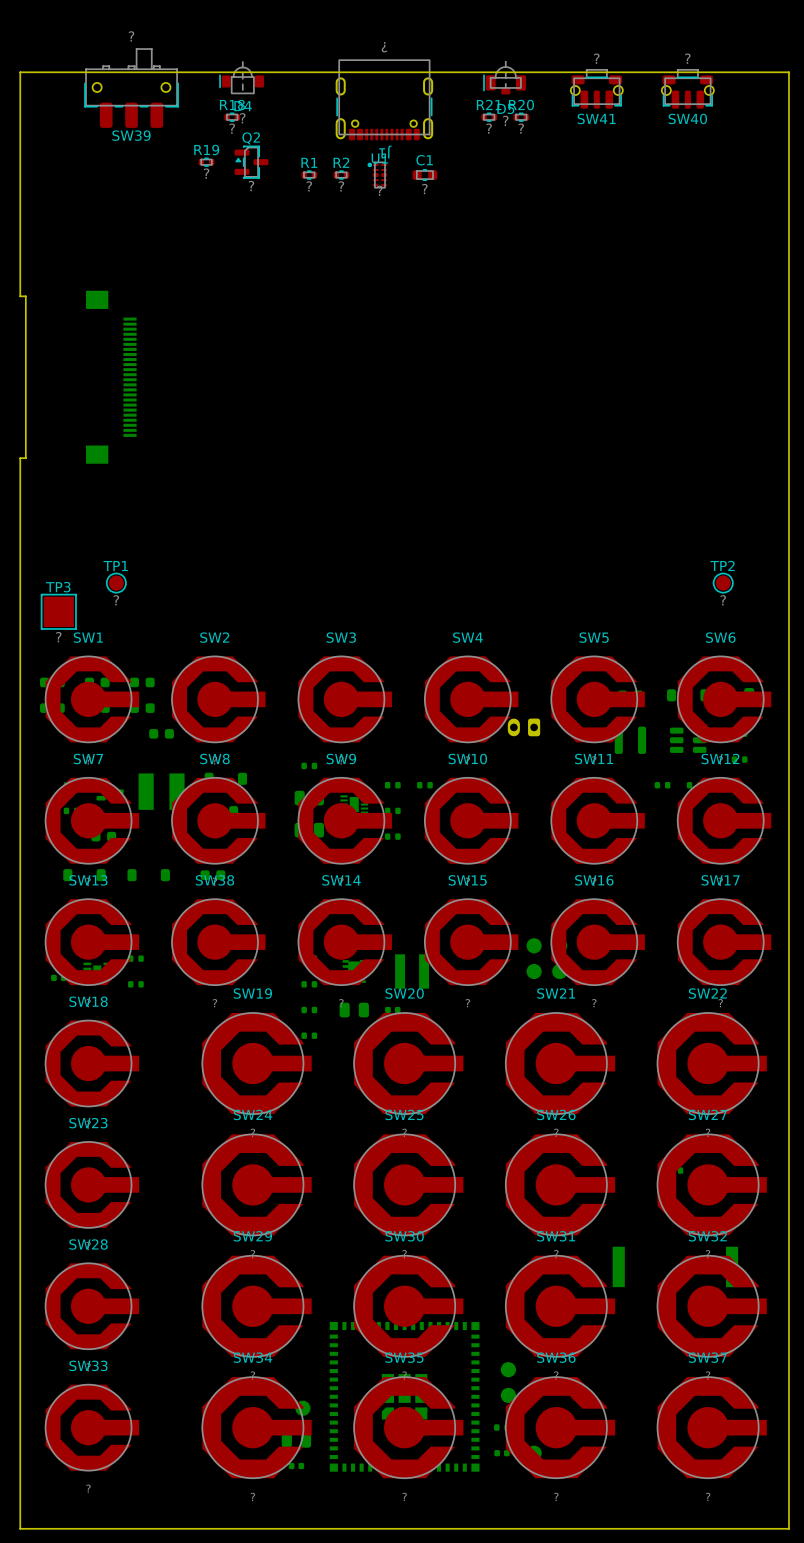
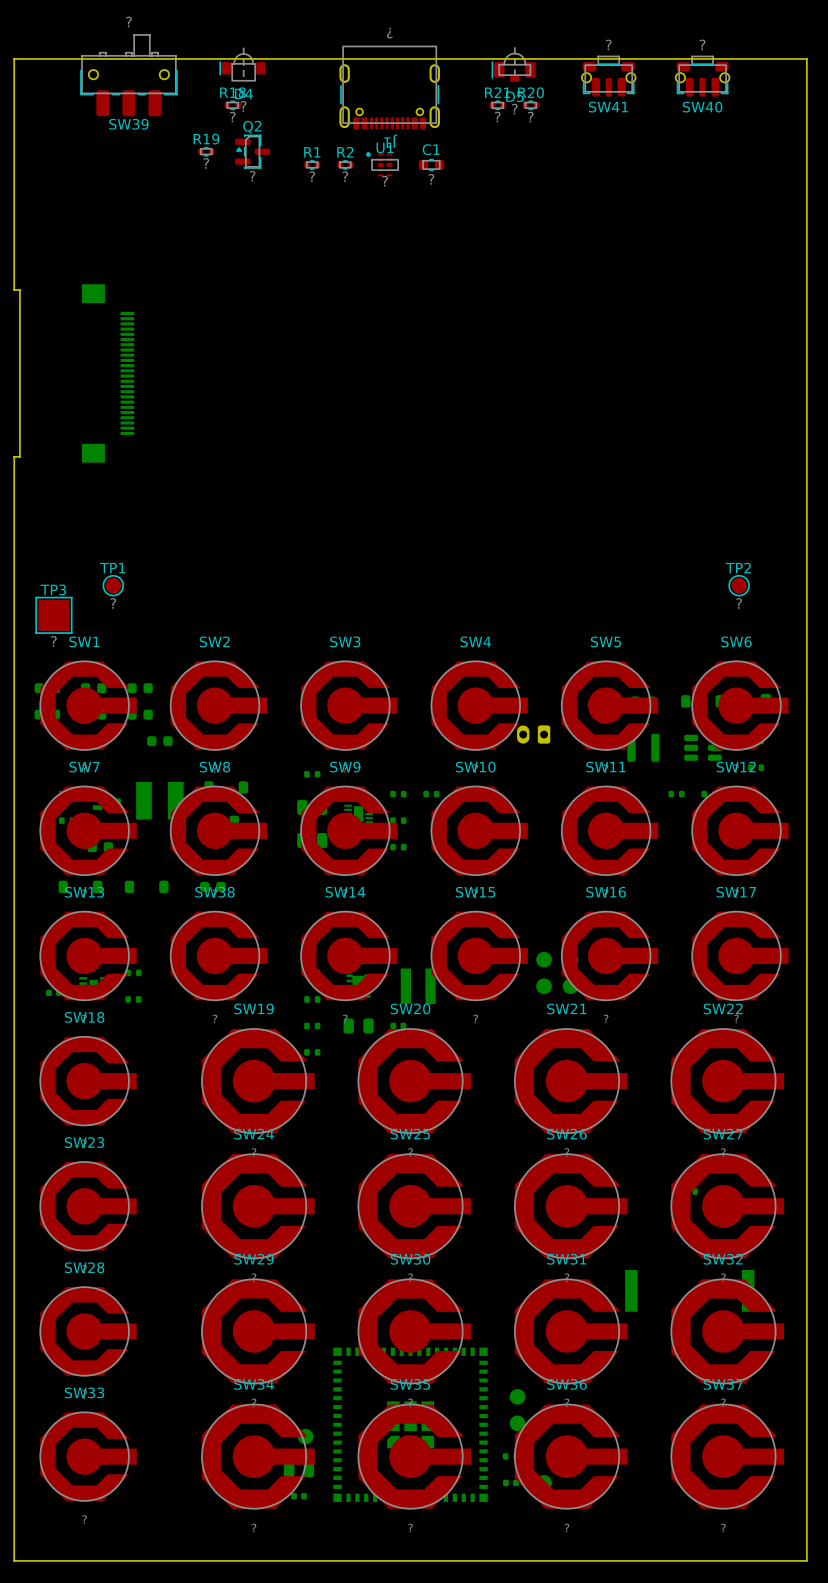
U1 footprint: [367, 161, 388, 189] -> [366, 152, 399, 177]

